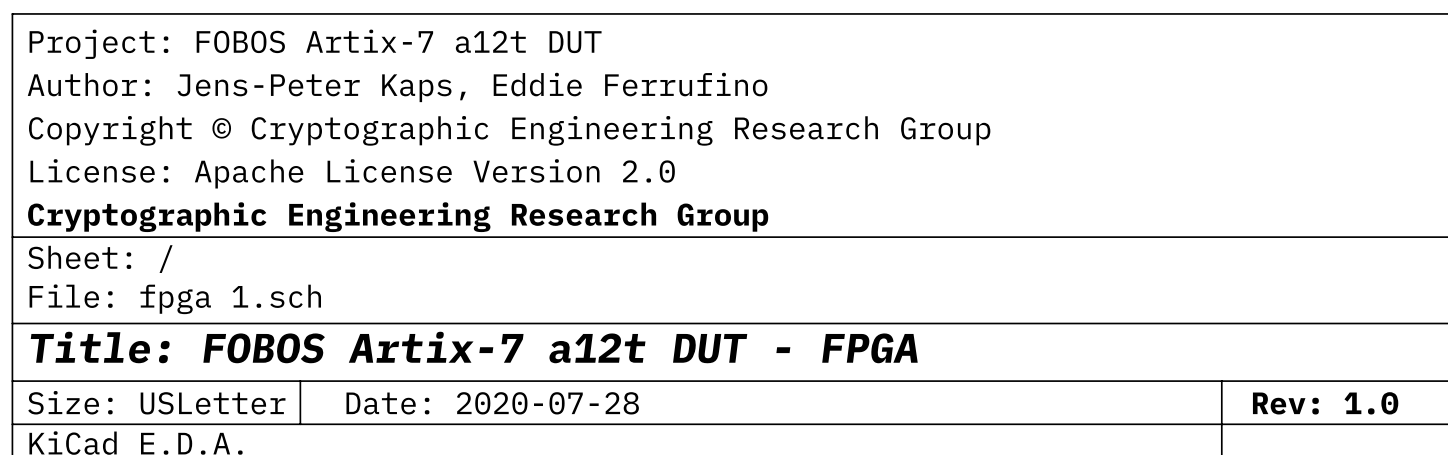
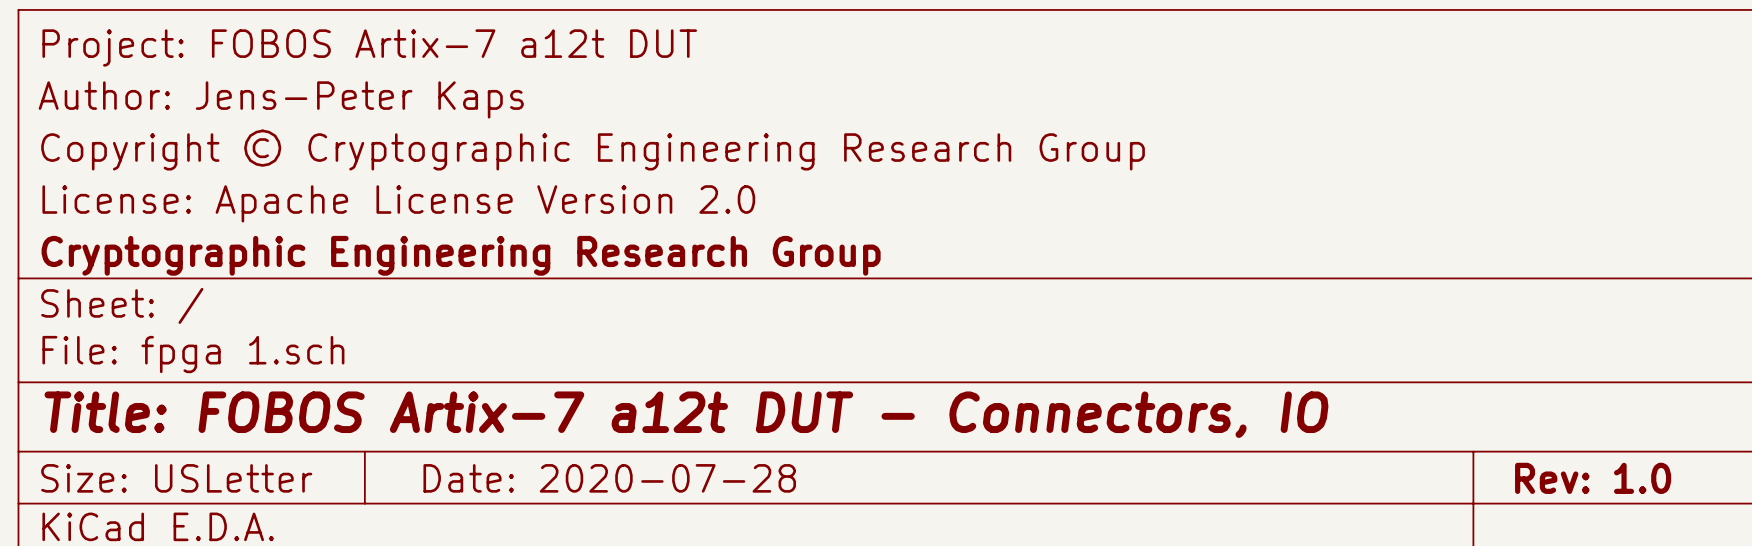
title block: Author: Jens-Peter Kaps, Eddie Ferrufino (397, 87) -> Author: Jens-Peter Kaps (281, 99)
title block: Title: FOBOS Artix-7 a12t DUT - FPGA (474, 347) -> Title: FOBOS Artix-7 a12t DUT - Connectors, IO (686, 414)

